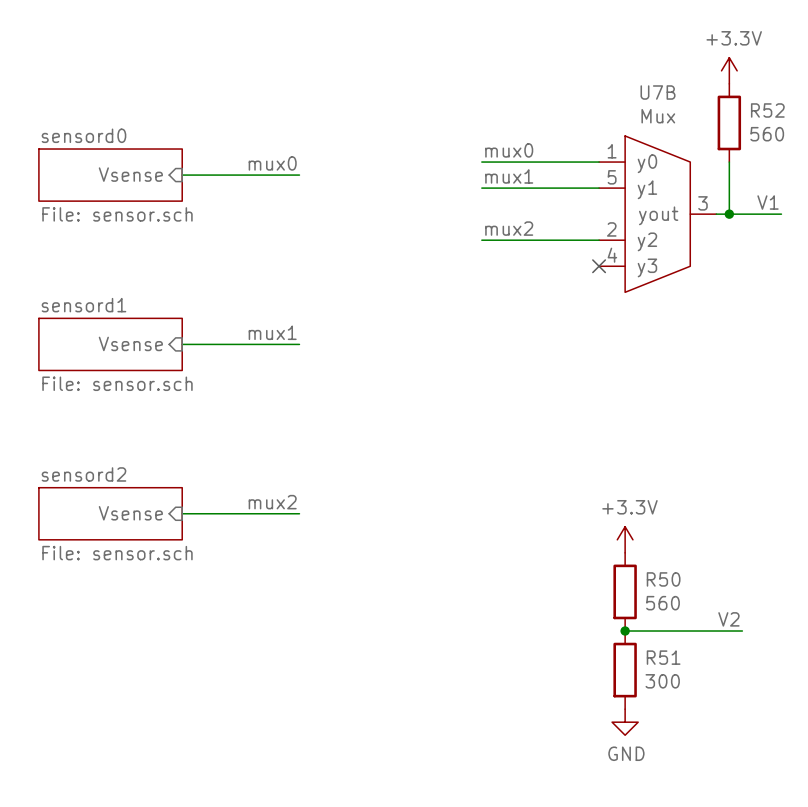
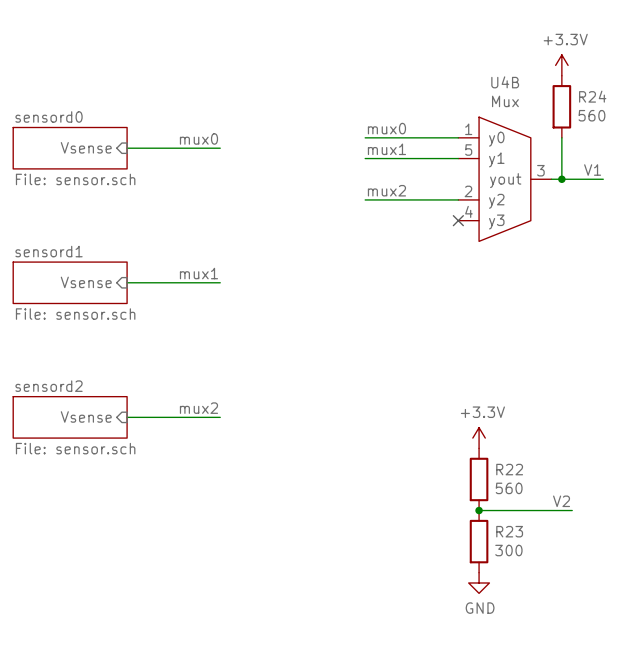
U7B name: U7B (658, 92) -> U4B (505, 82)
R52 name: R52 (767, 110) -> R24 (592, 96)
R50 name: R50 (663, 579) -> R22 (509, 469)
R51 name: R51 (663, 657) -> R23 (509, 531)

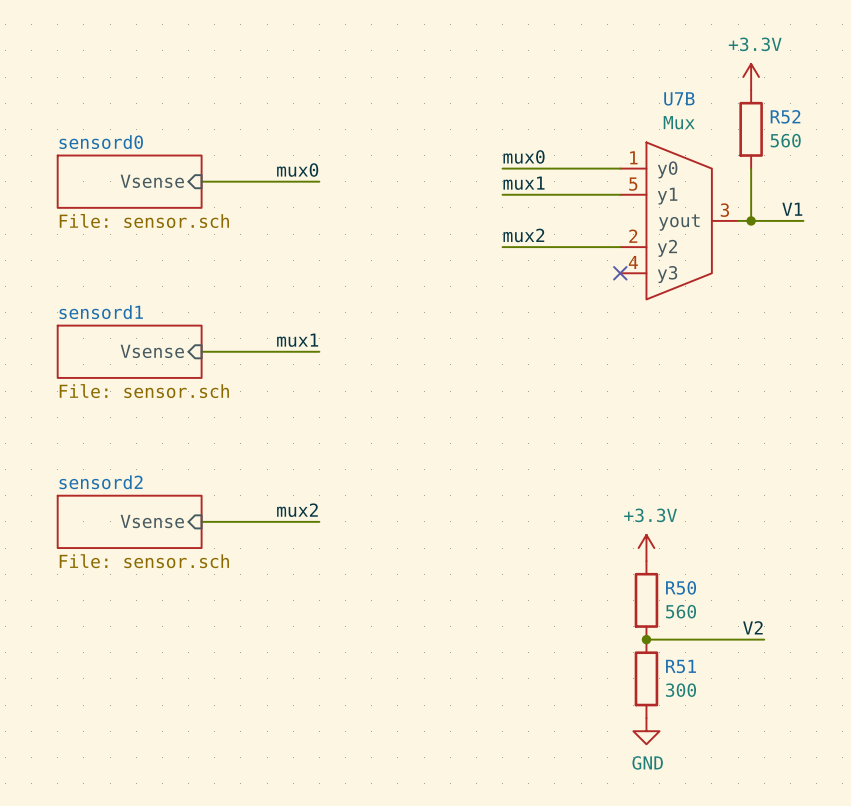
U4B name: U4B (505, 82) -> U7B (679, 98)
R24 name: R24 (592, 96) -> R52 (785, 116)
R22 name: R22 (509, 469) -> R50 (681, 587)
R23 name: R23 (509, 531) -> R51 (681, 666)

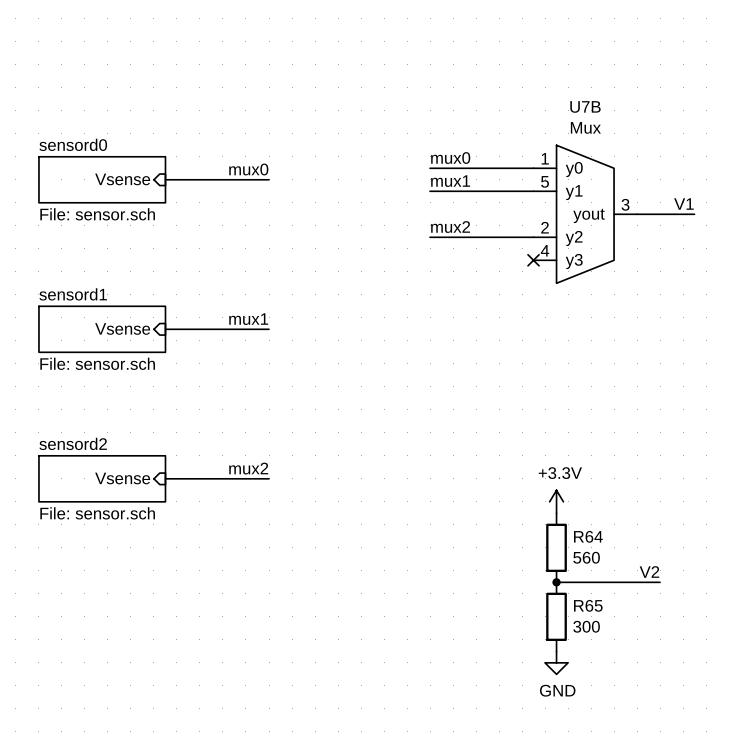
power symbol: +3.3V (751, 77) -> none
R52: 560 (751, 129) -> none
wire: (751, 168) (751, 220) -> none
junction: (751, 220) -> none
R50 name: R50 (681, 587) -> R64 (588, 536)
R51 name: R51 (681, 666) -> R65 (588, 605)

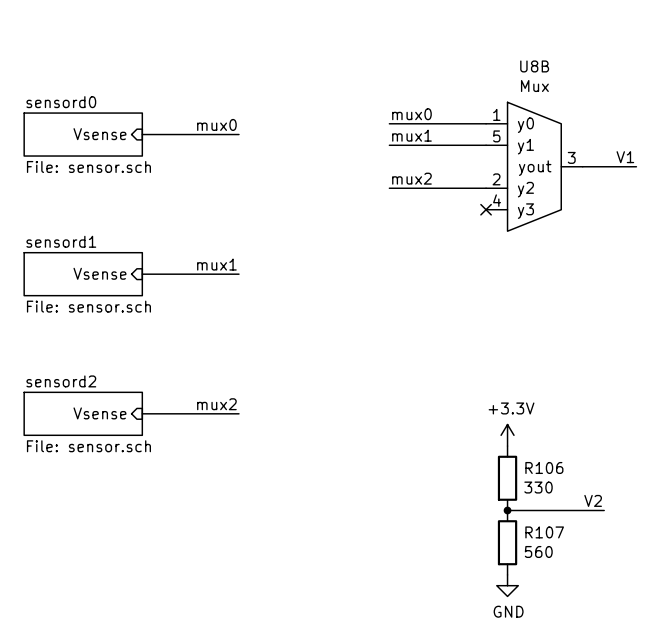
U7B name: U7B (585, 106) -> U8B (534, 66)
R64 name: R64 (588, 536) -> R106 (544, 467)
R64 value: 560 (586, 557) -> 330 (538, 487)
R65 name: R65 (588, 605) -> R107 (544, 532)
R65 value: 300 (586, 626) -> 560 (538, 551)

